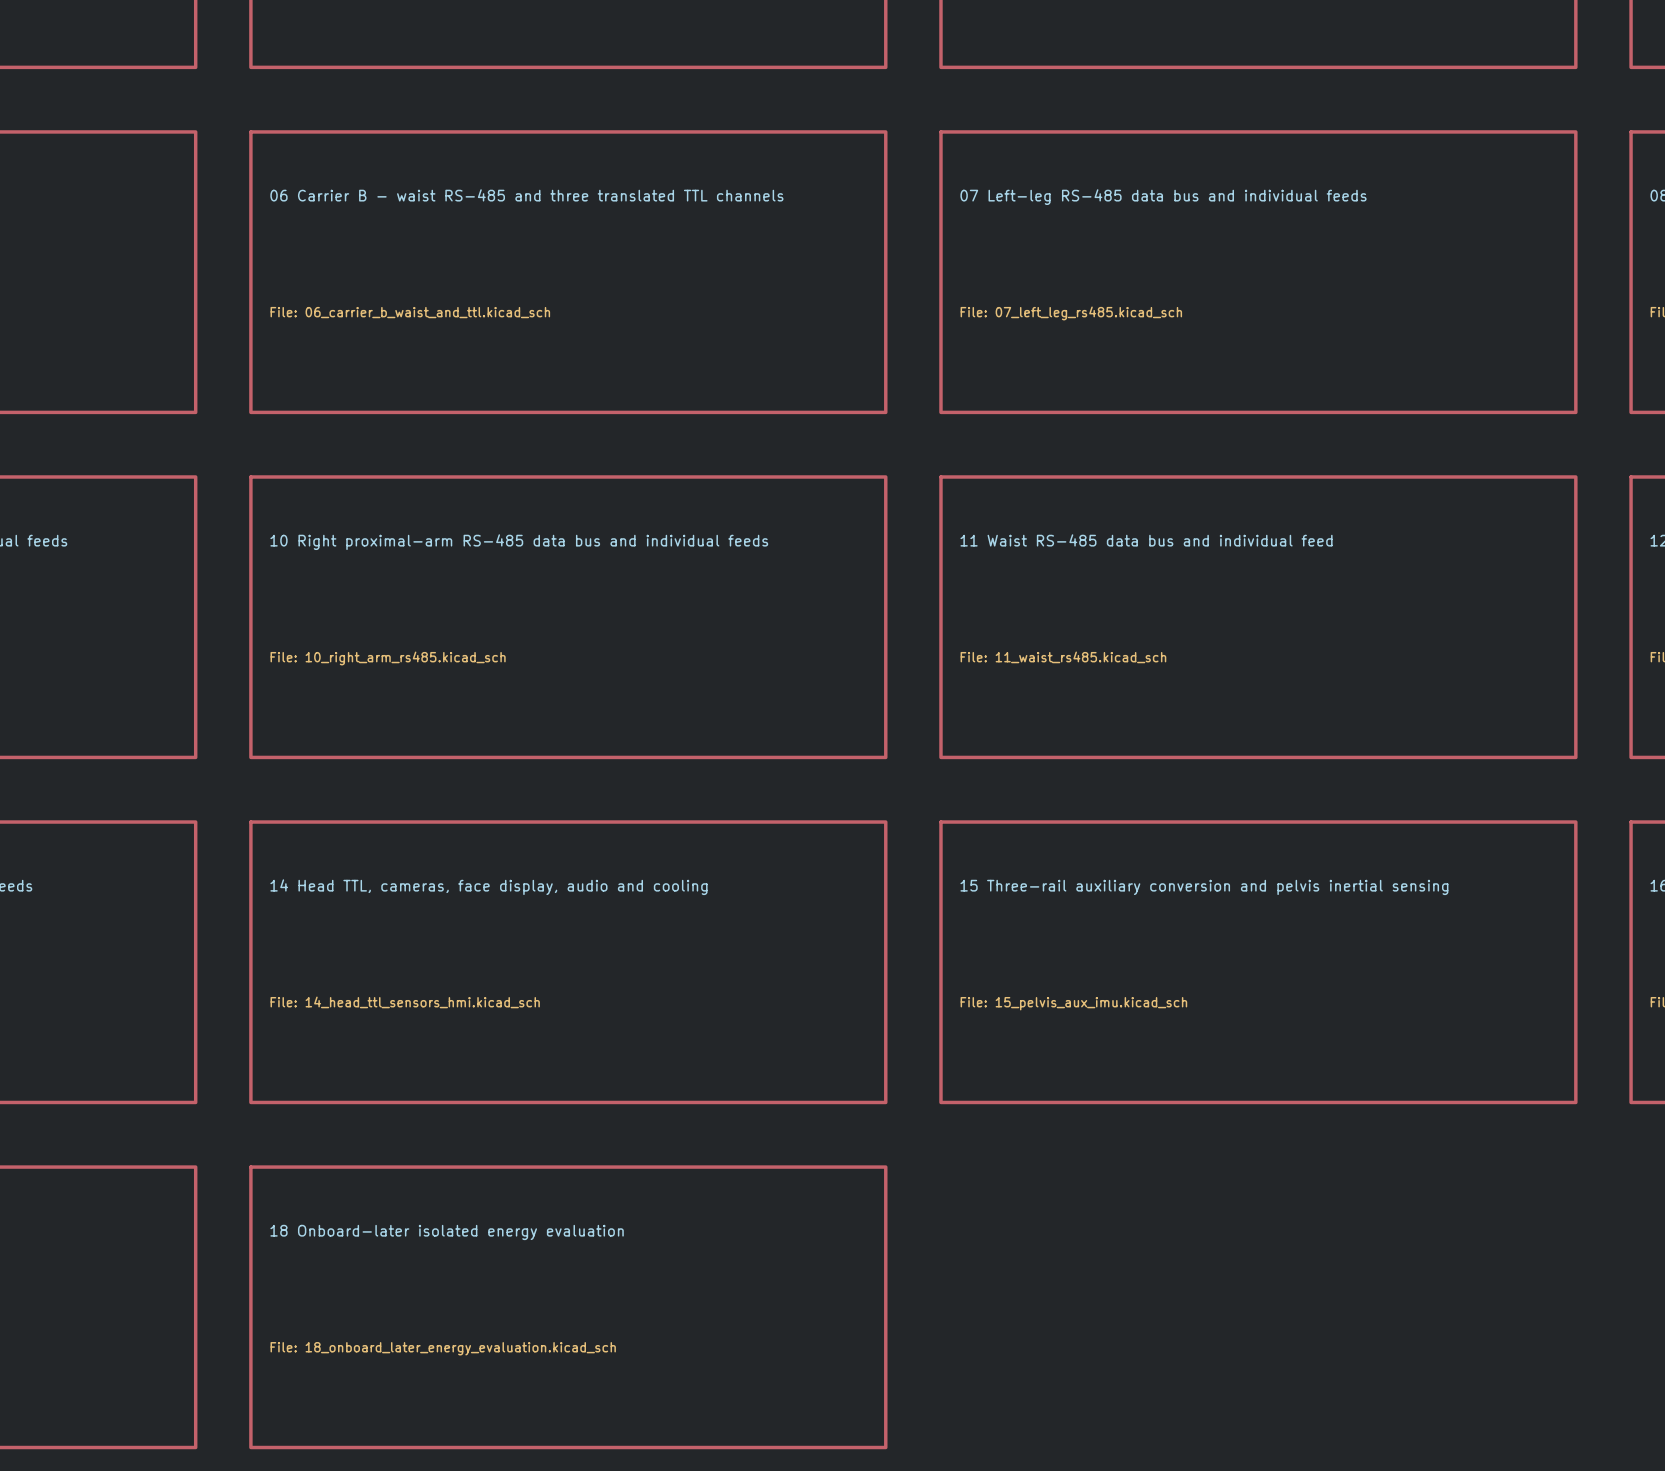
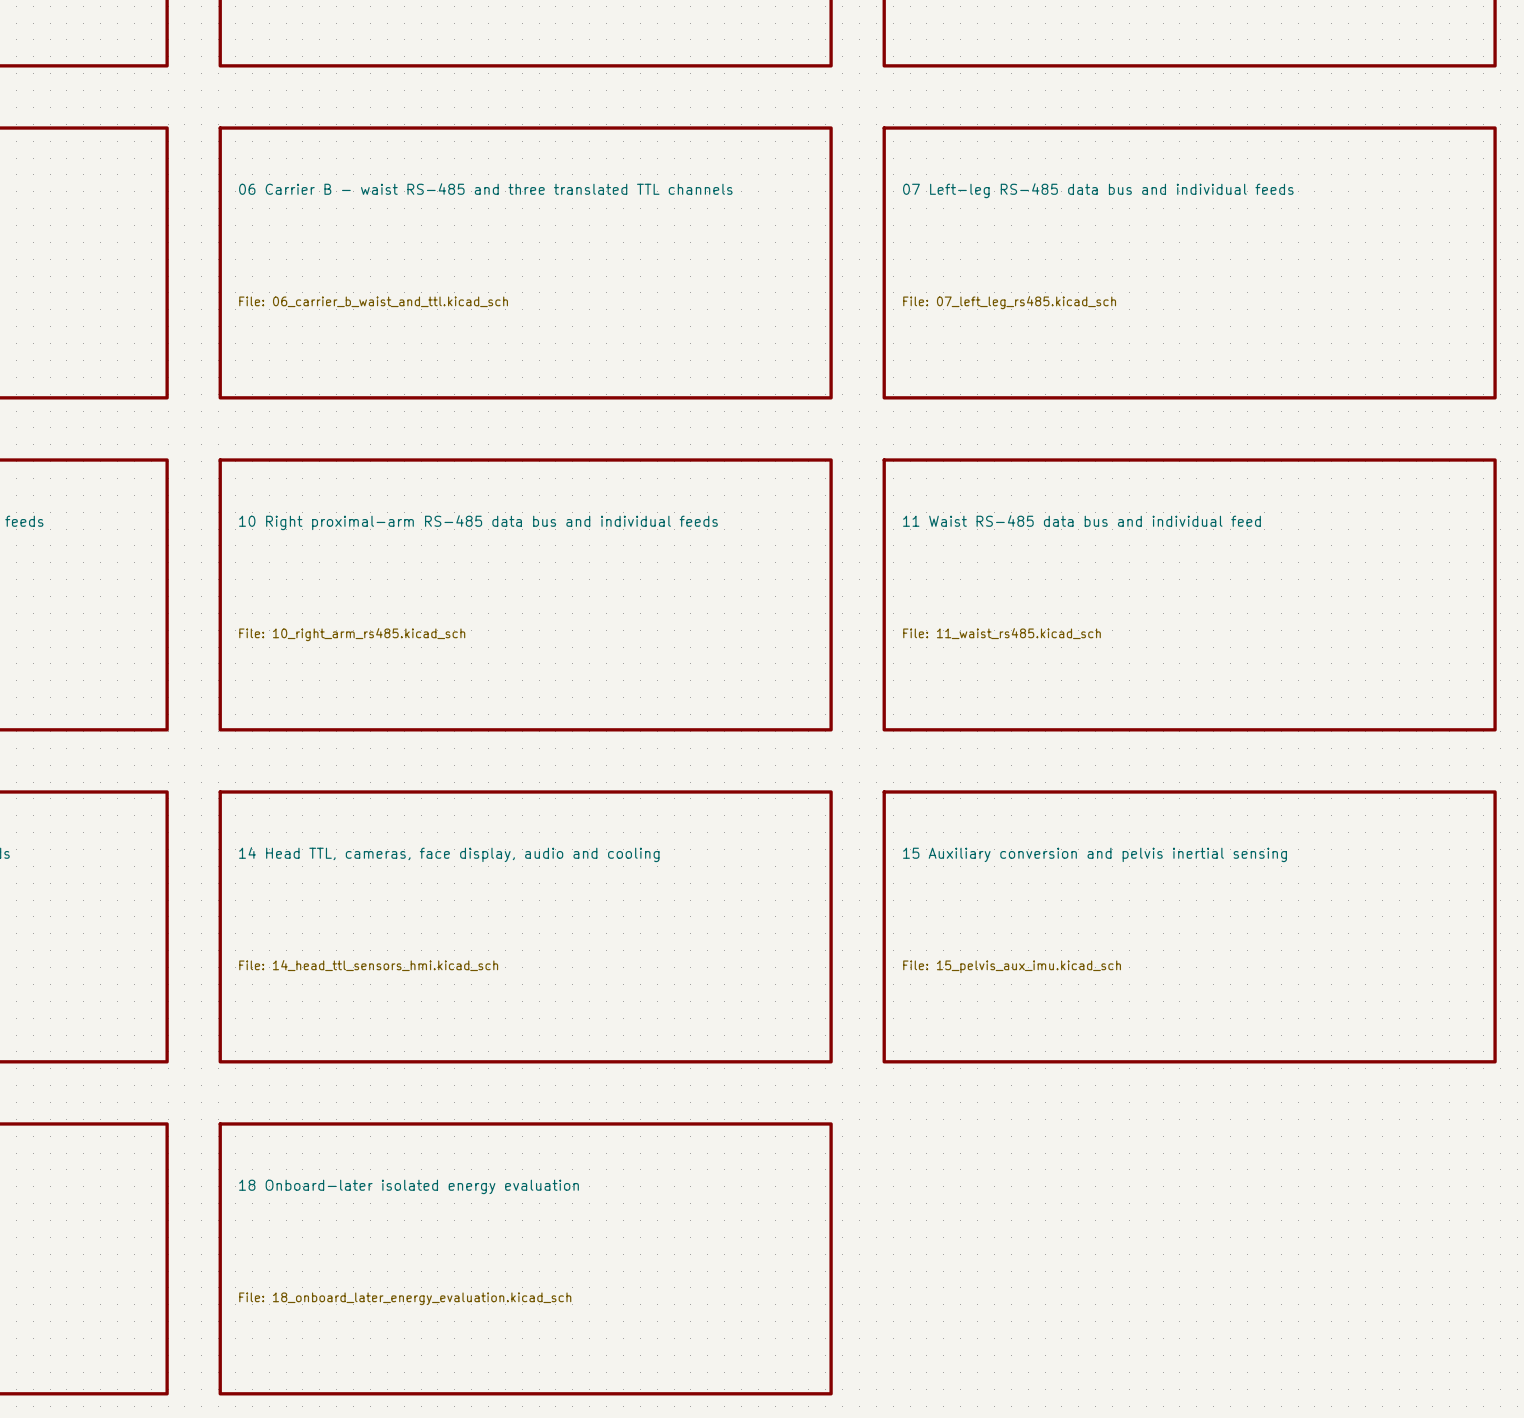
sheet 15 Three-rail auxiliary conversion and pelvis inertial sensing name: 15 Three-rail auxiliary conversion and pelvis inertial sensing (1204, 887) -> 15 Auxiliary conversion and pelvis inertial sensing (1095, 854)

